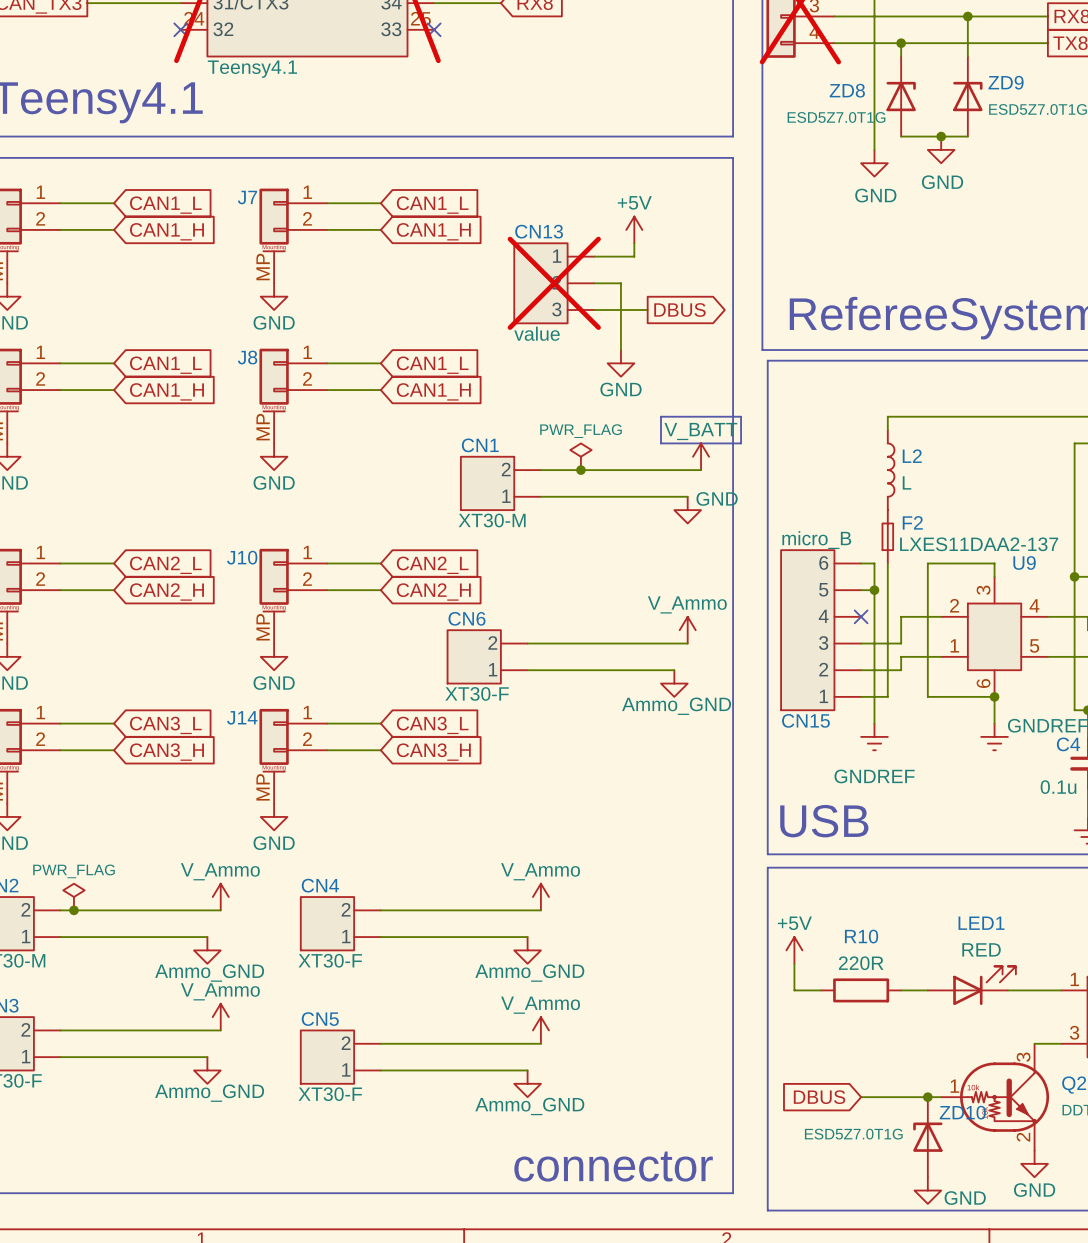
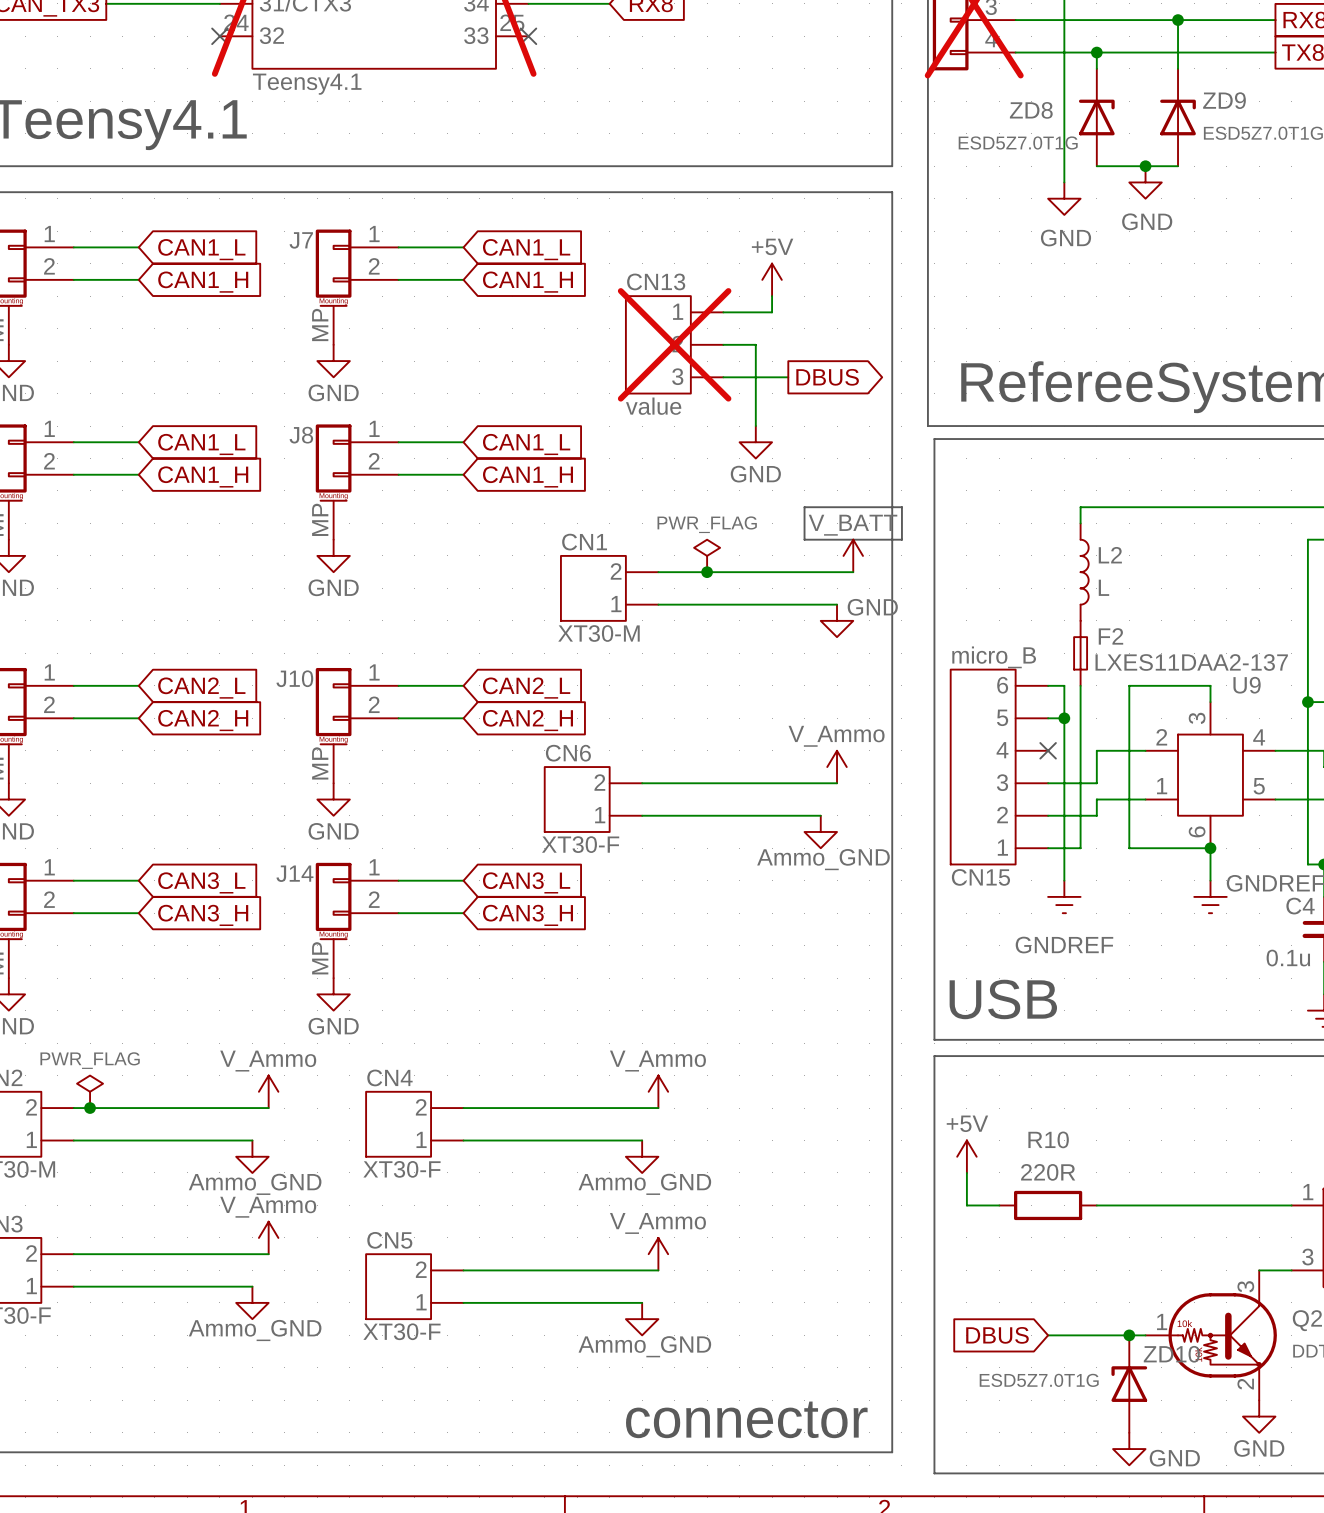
LED1: RED (971, 985) -> none

